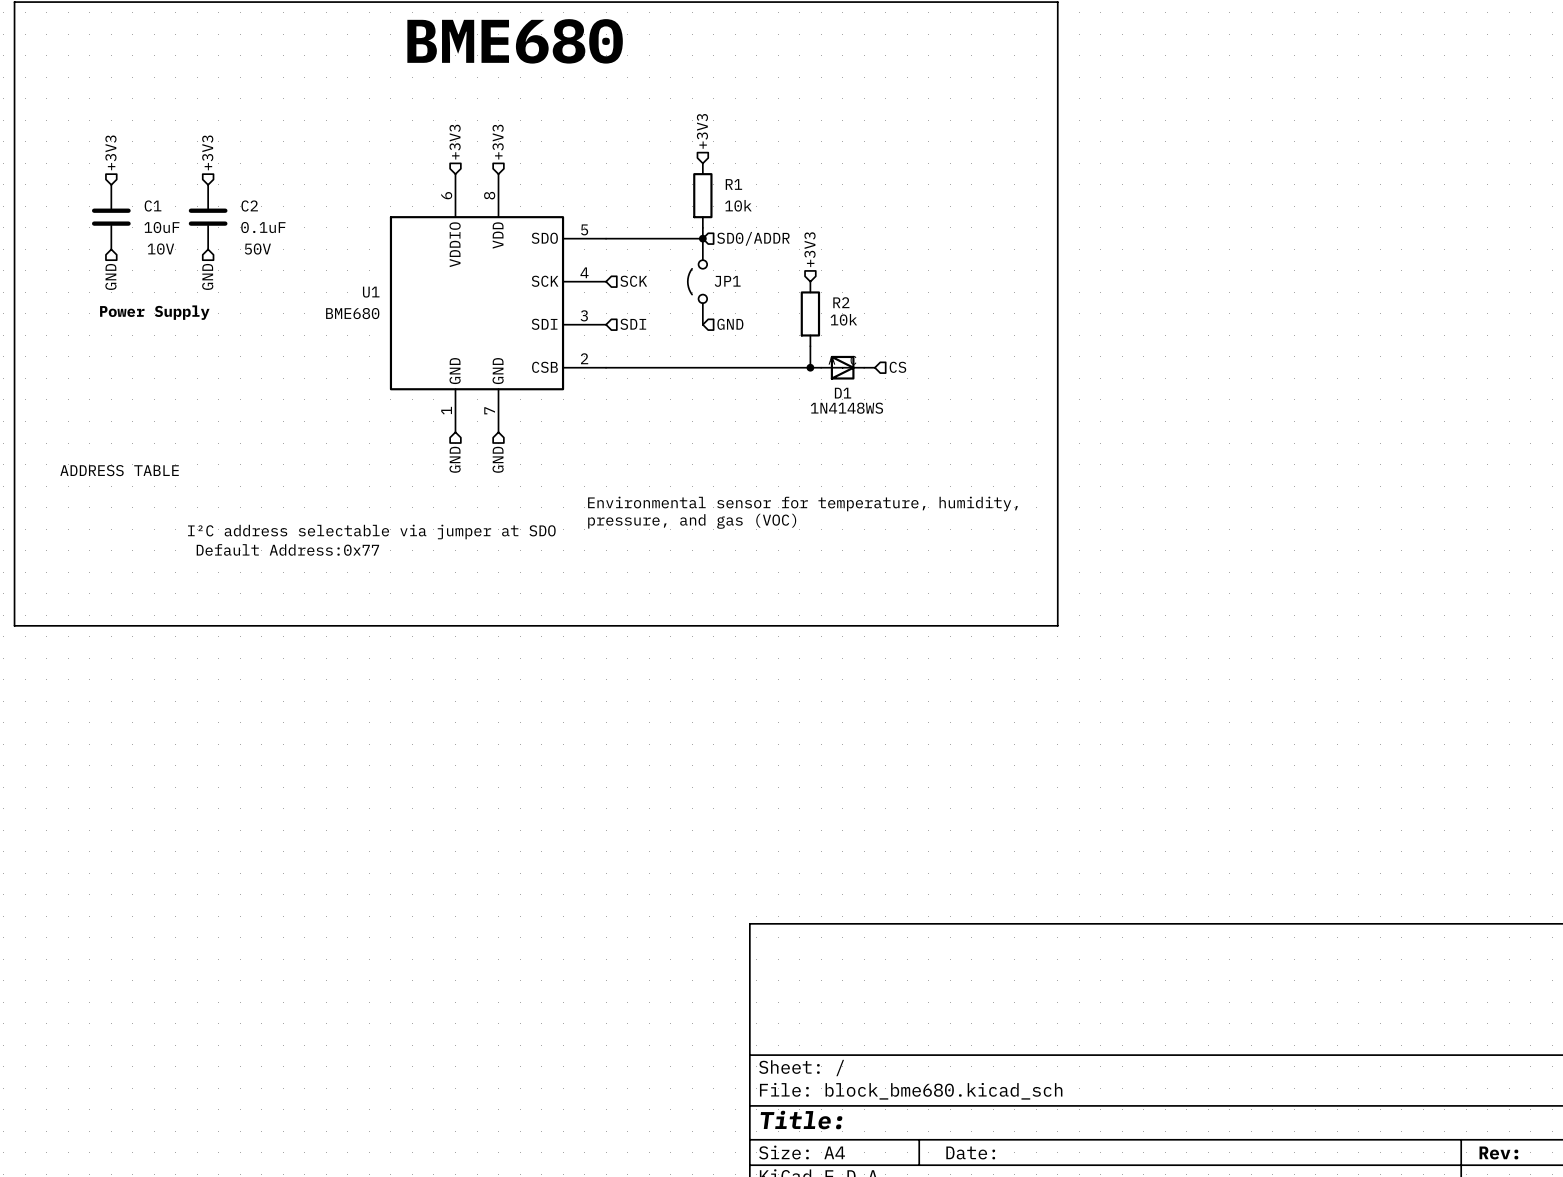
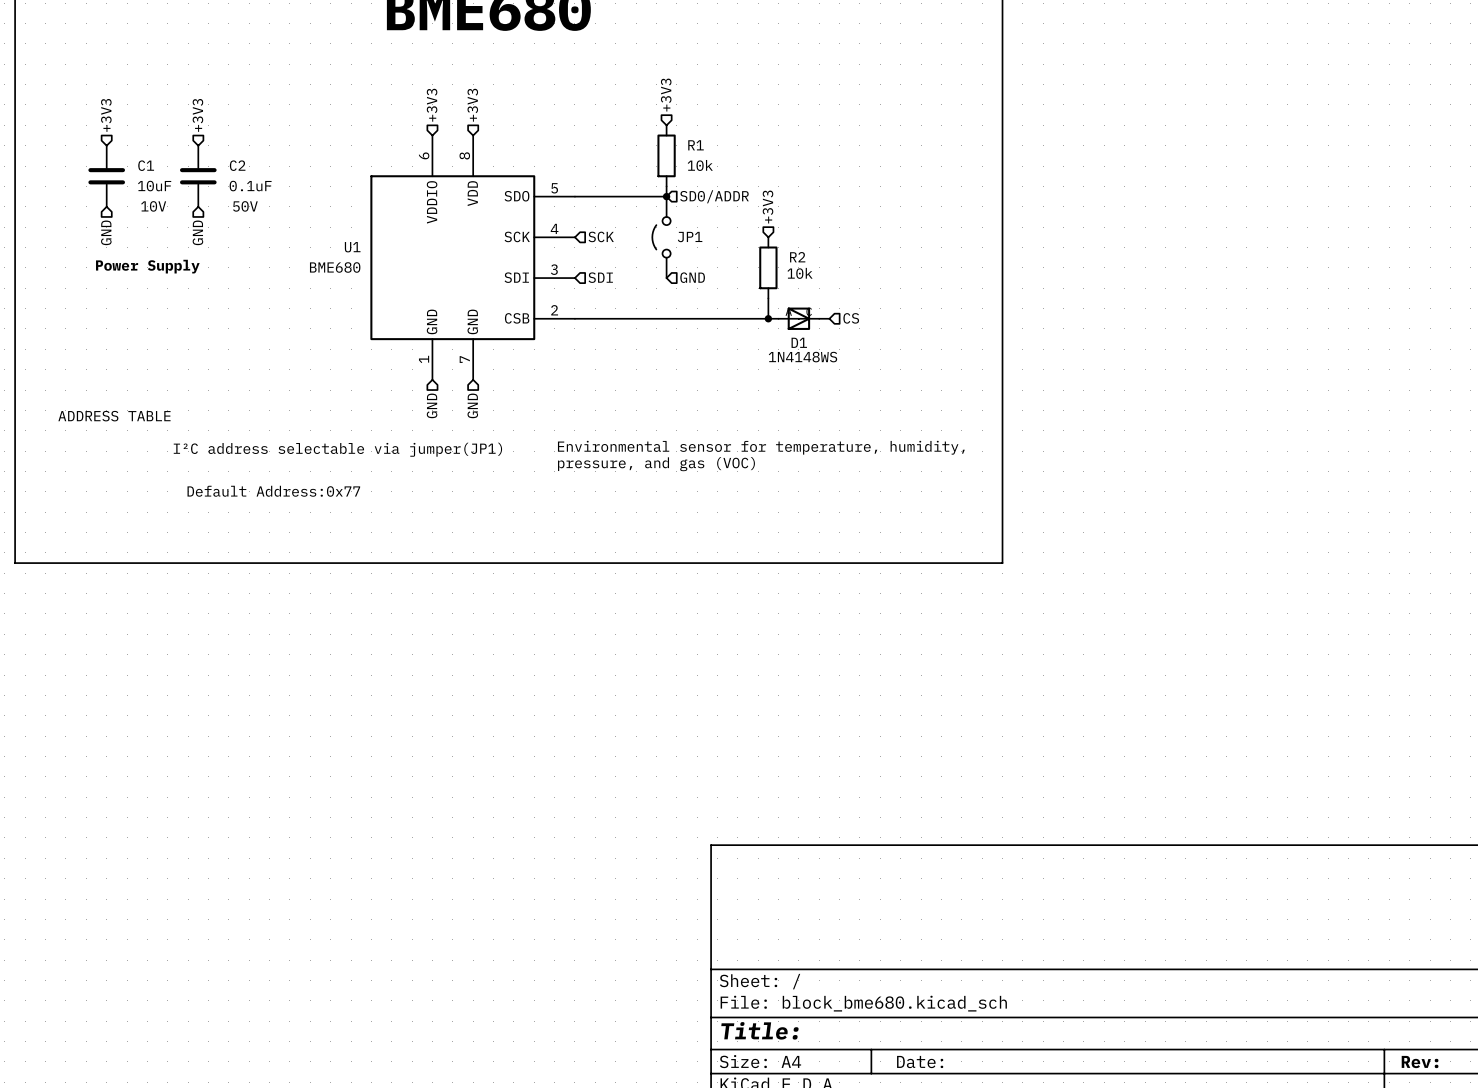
text: none -> I²C address selectable via jumper(JP1) (337, 449)
text: I²C address selectable via jumper at SDO (371, 531) -> none

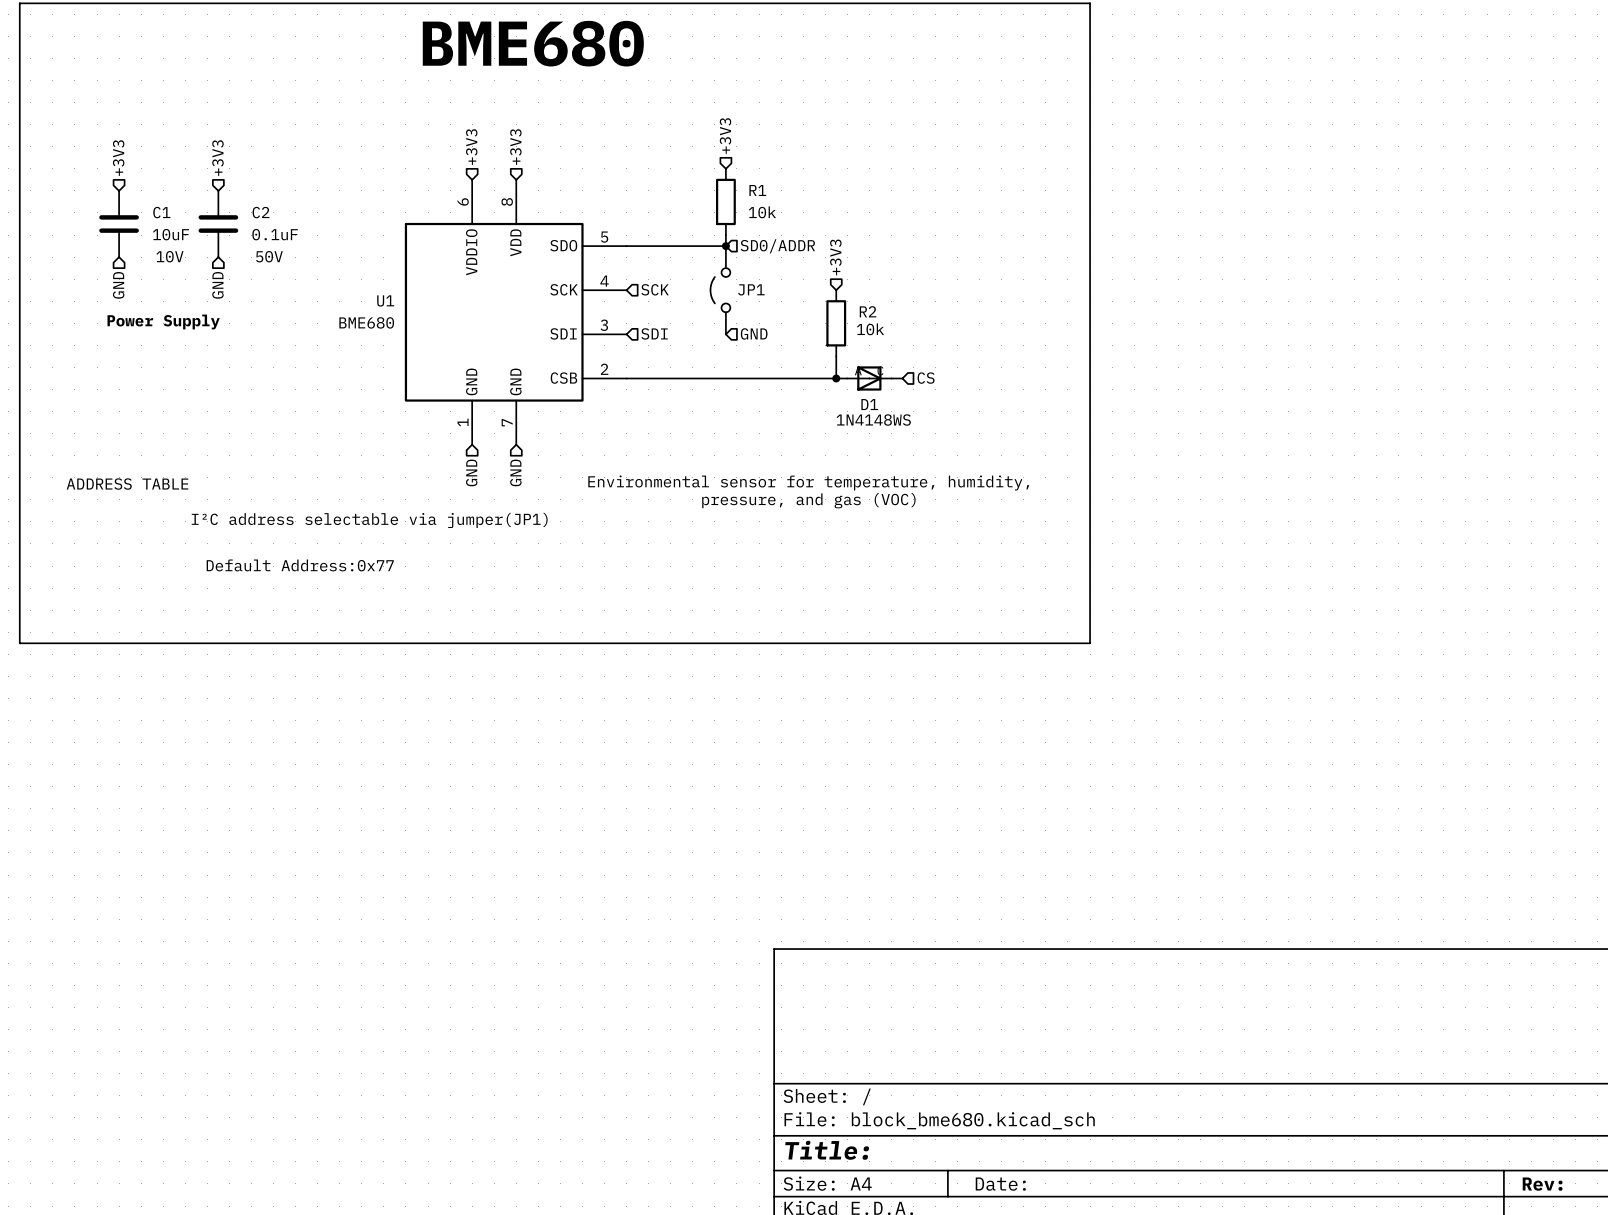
text position: Environmental sensor for temperature, humidity, (761, 447) -> Environmental sensor for temperature, humidity, (808, 482)
text position: pressure, and gas (VOC) (656, 464) -> pressure, and gas (VOC) (808, 500)

